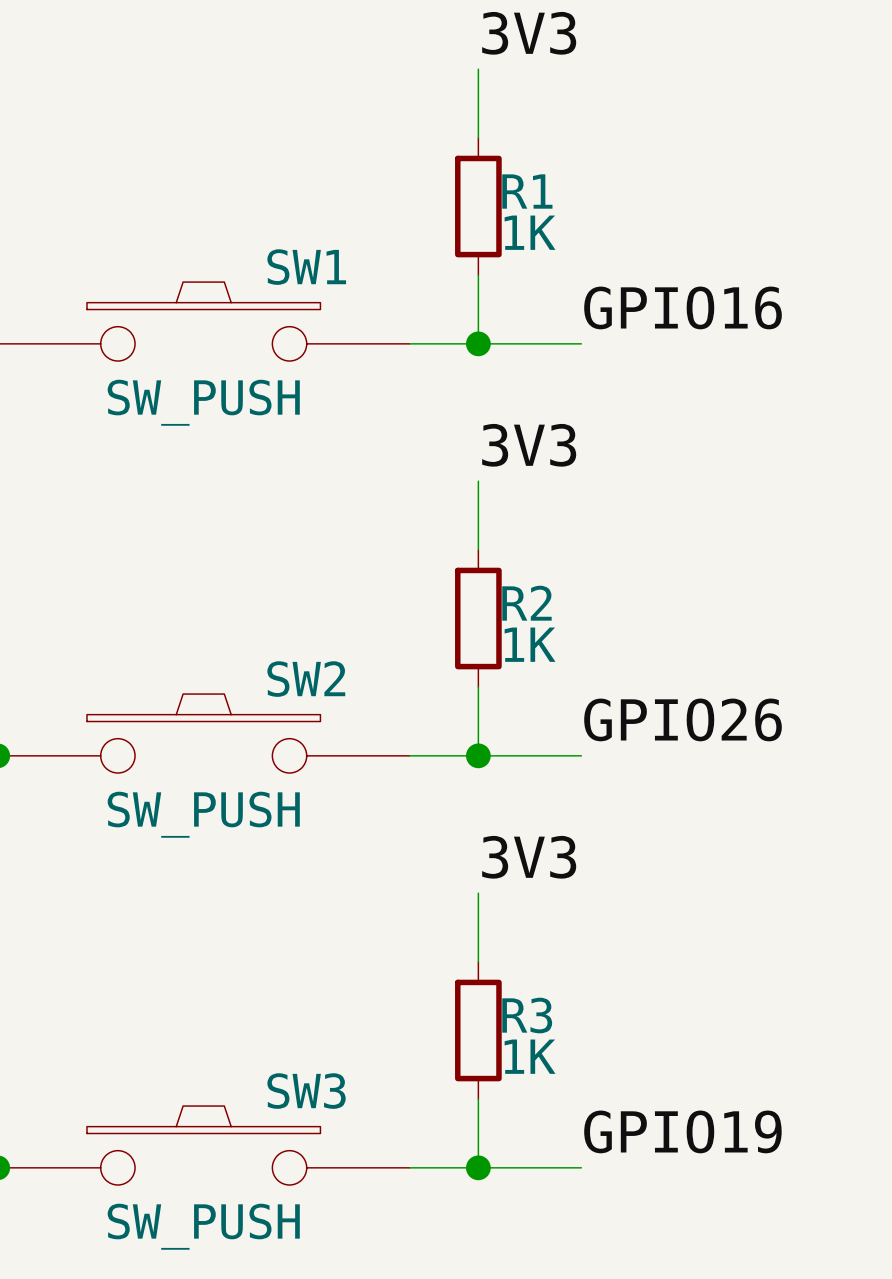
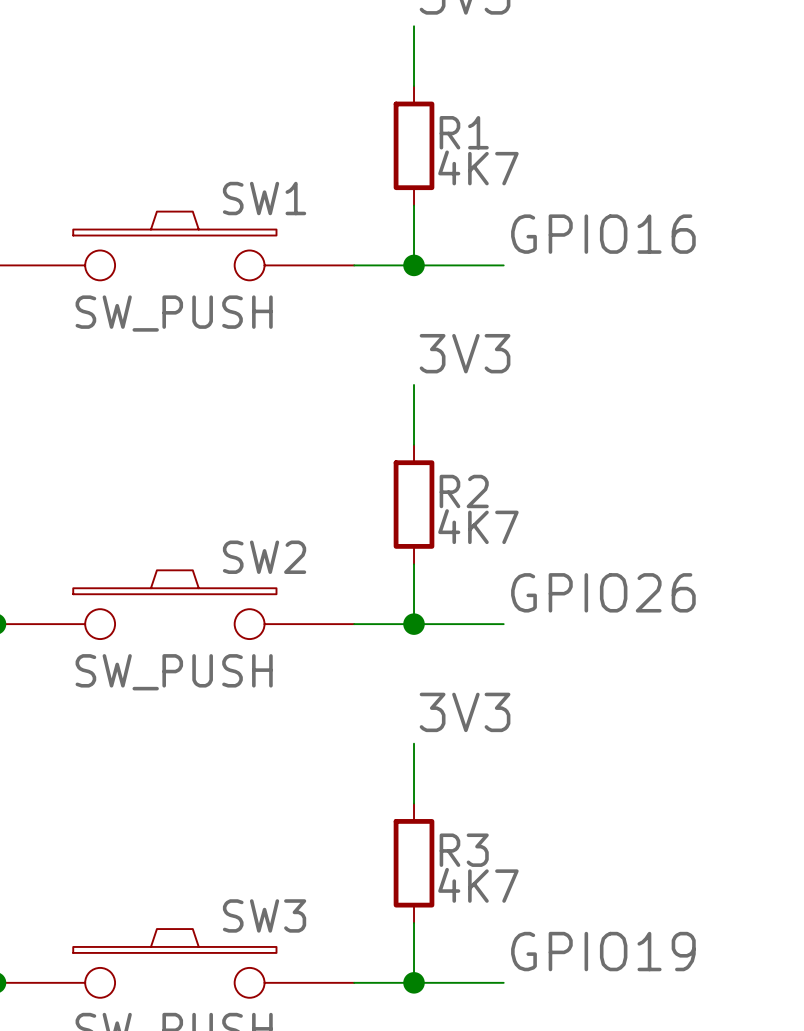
R1 value: 1K (530, 232) -> 4K7 (478, 167)
R2 value: 1K (530, 644) -> 4K7 (478, 526)
R3 value: 1K (530, 1056) -> 4K7 (478, 885)

